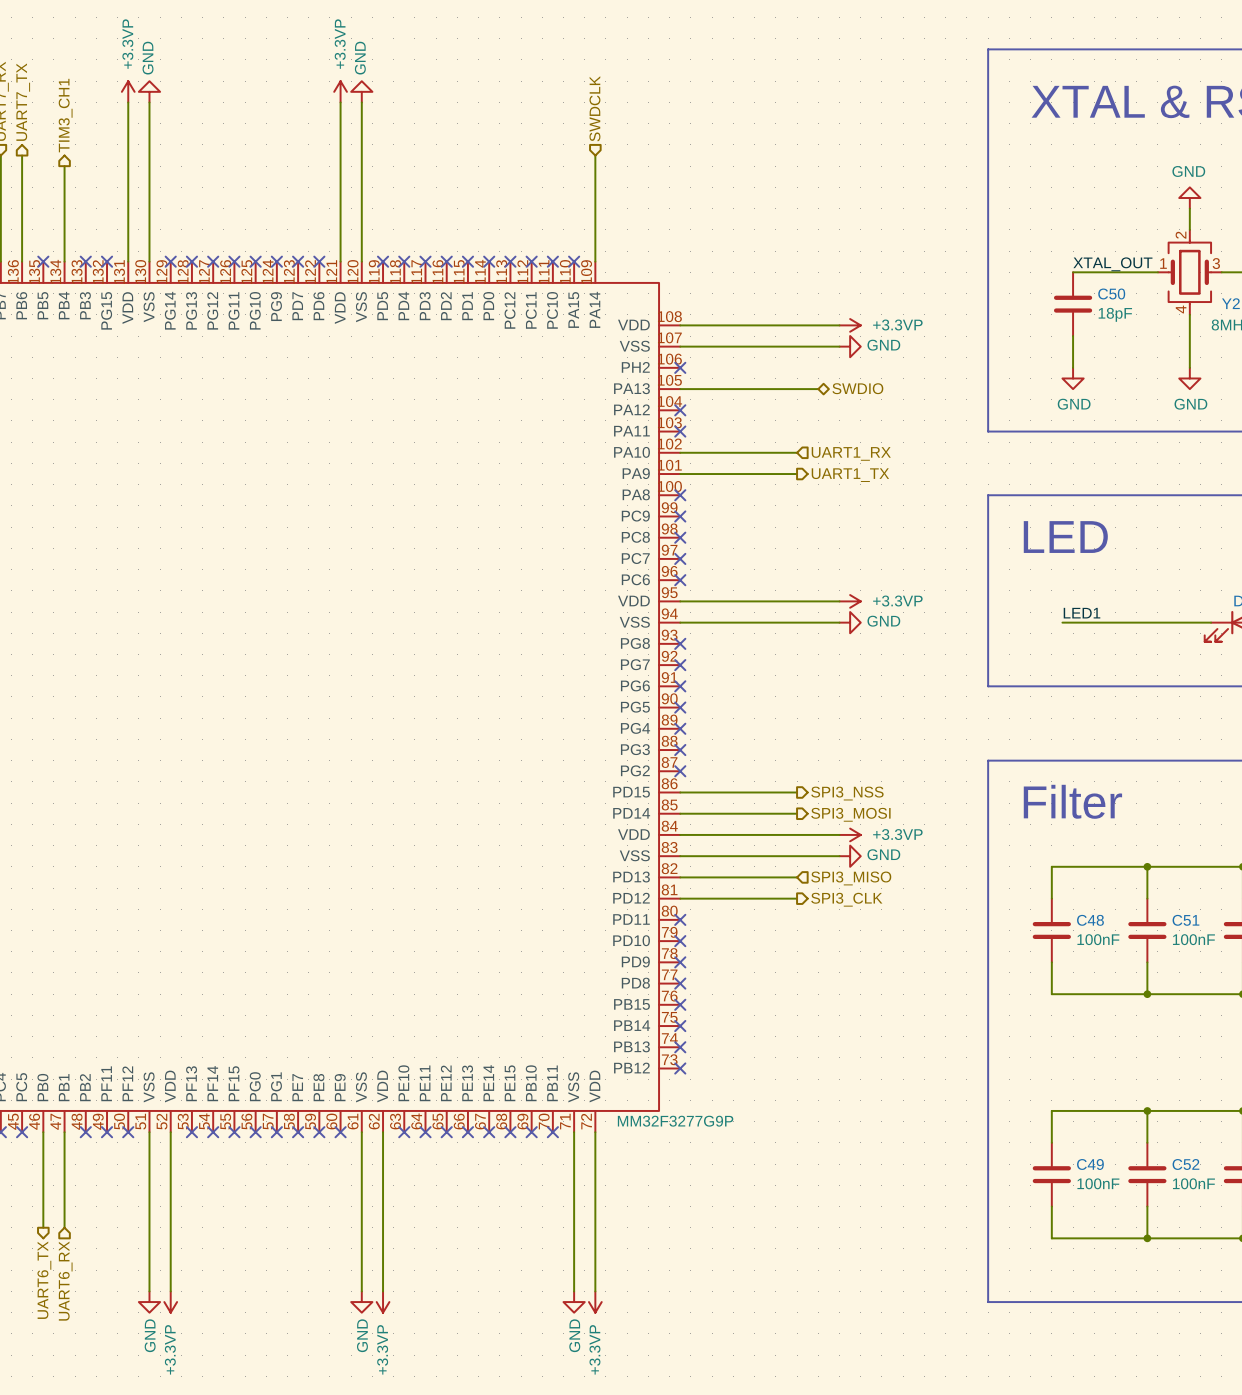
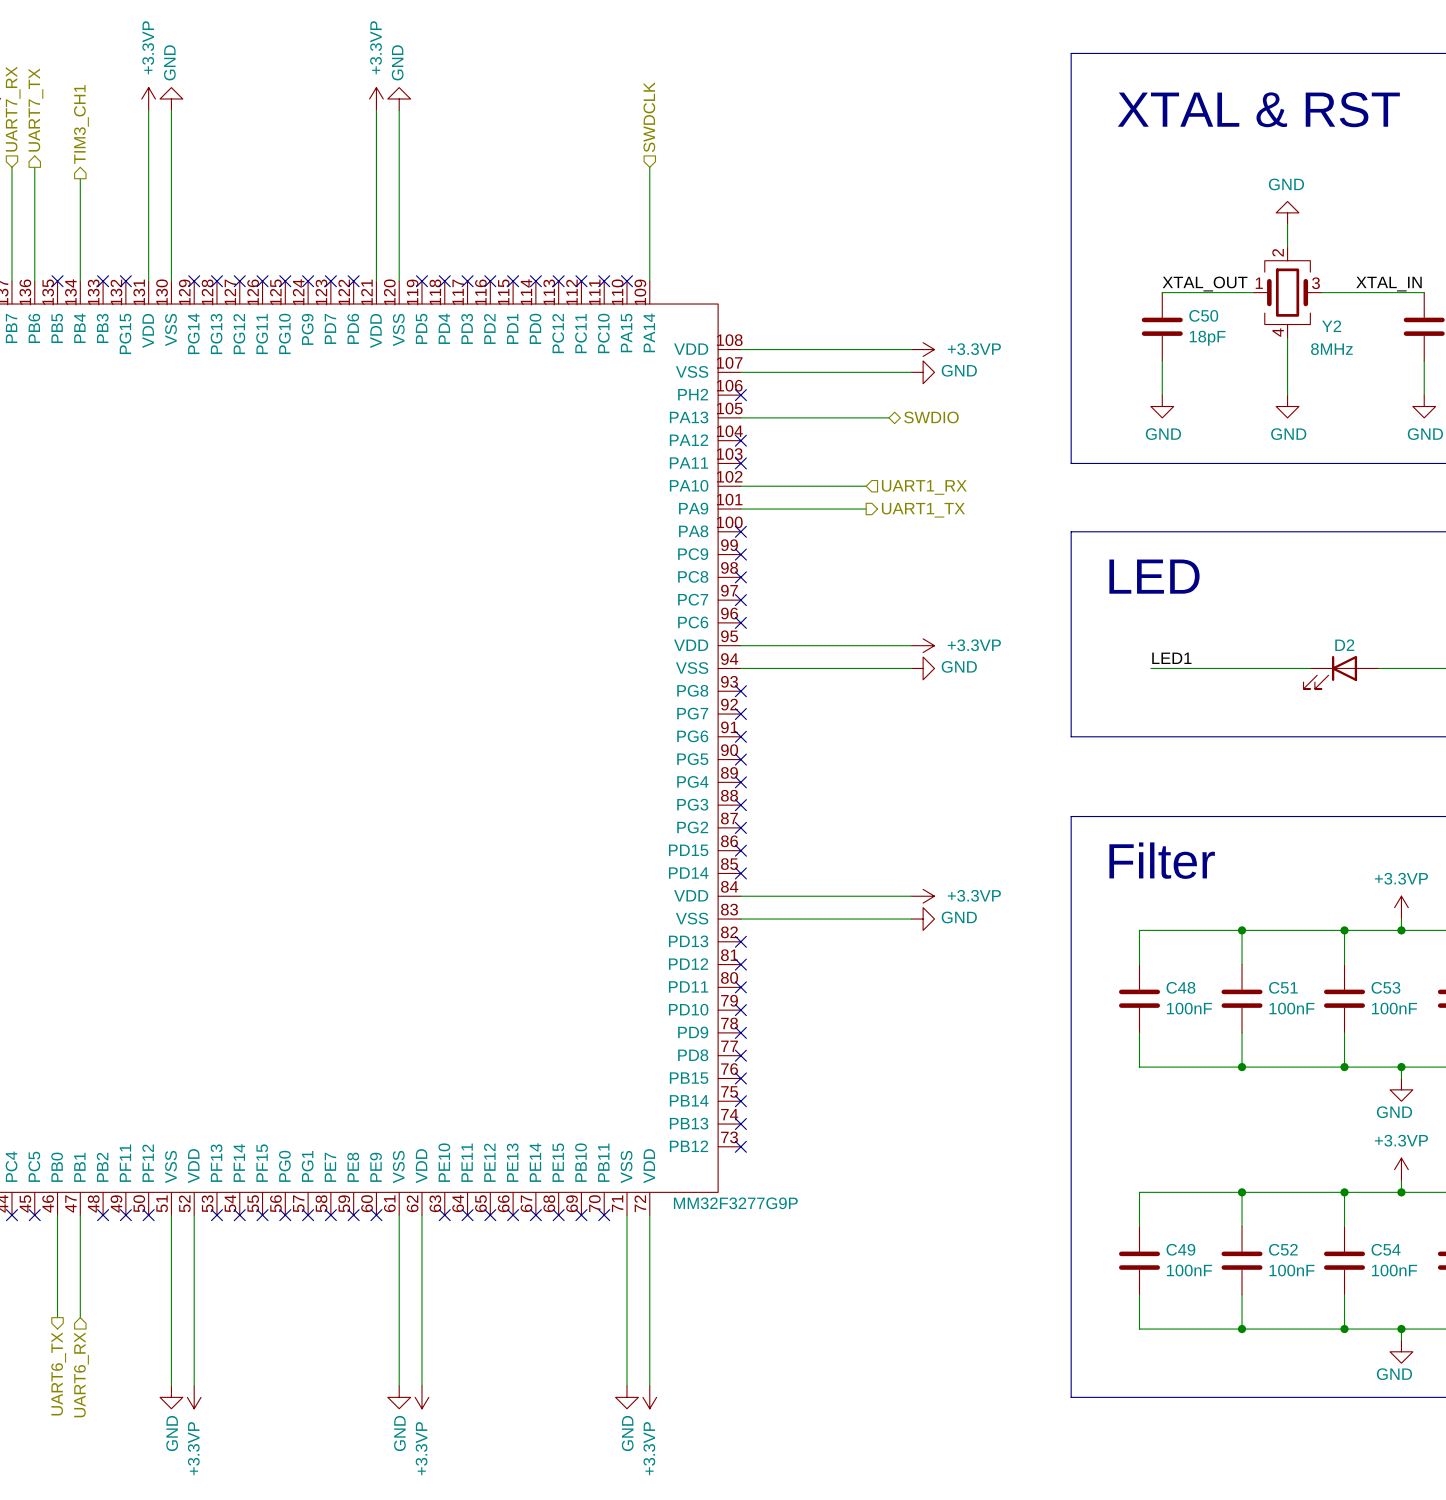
wire: (680, 792) (797, 792) -> none
no-connect mark: none -> (740, 850)
hierarchical label: SPI3_NSS (847, 793) -> none
wire: (680, 813) (797, 813) -> none
no-connect mark: none -> (740, 873)
hierarchical label: SPI3_MOSI (850, 814) -> none
wire: (680, 877) (797, 877) -> none
no-connect mark: none -> (740, 941)
hierarchical label: SPI3_MISO (851, 878) -> none
wire: (680, 898) (797, 898) -> none
no-connect mark: none -> (740, 964)
hierarchical label: SPI3_CLK (846, 899) -> none

